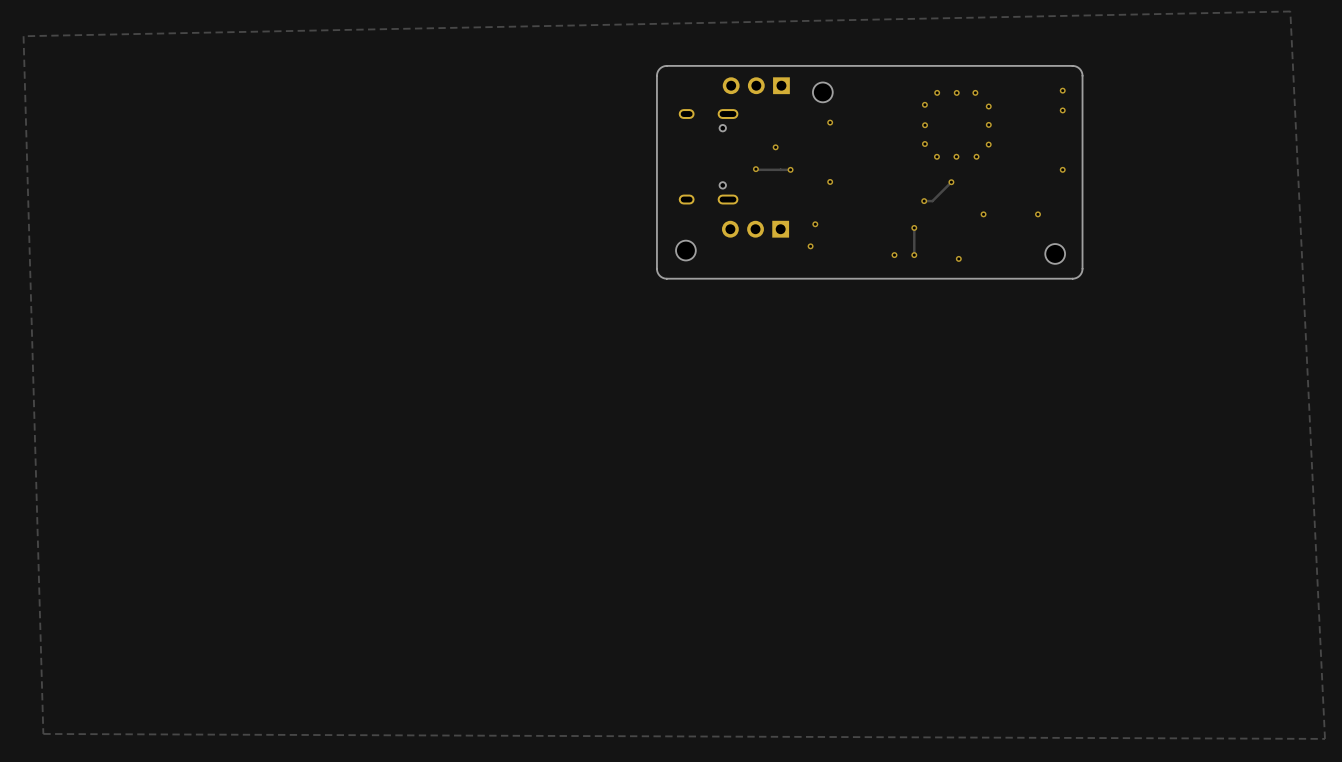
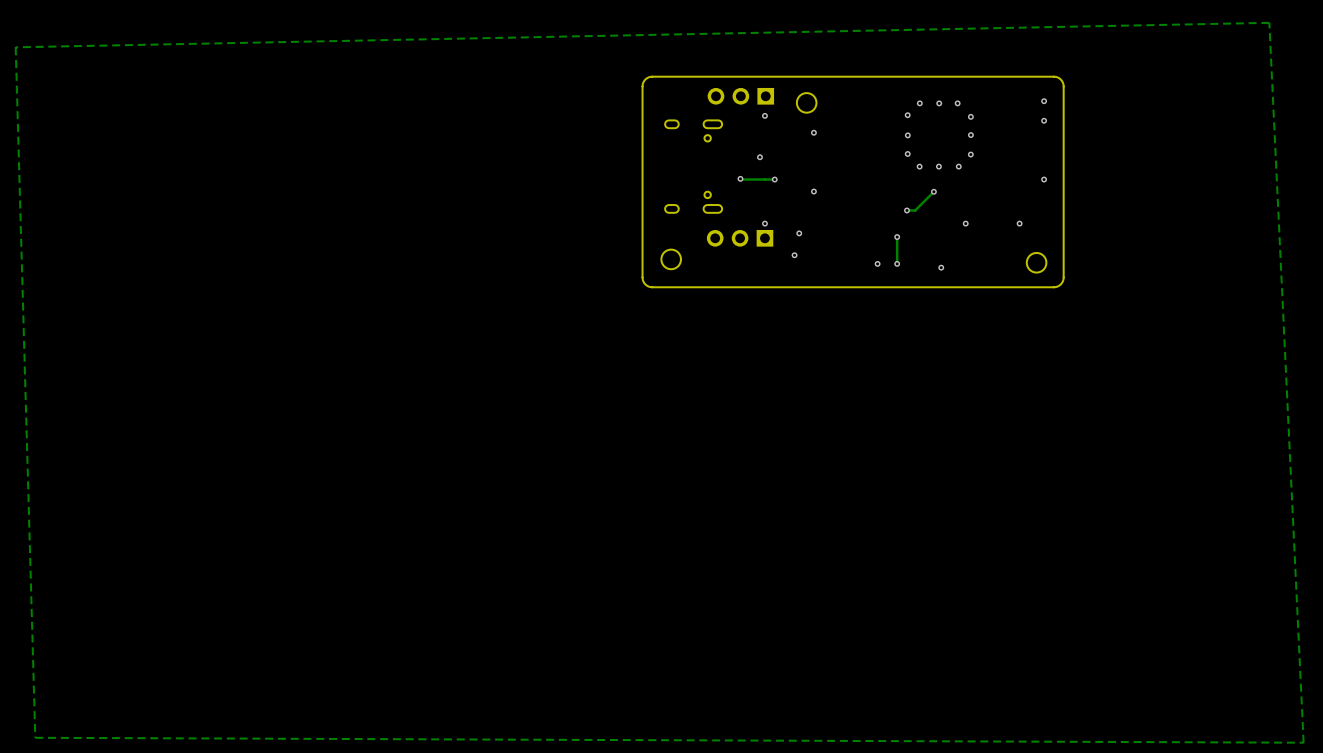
via: none -> (764, 115)
via: none -> (764, 223)

